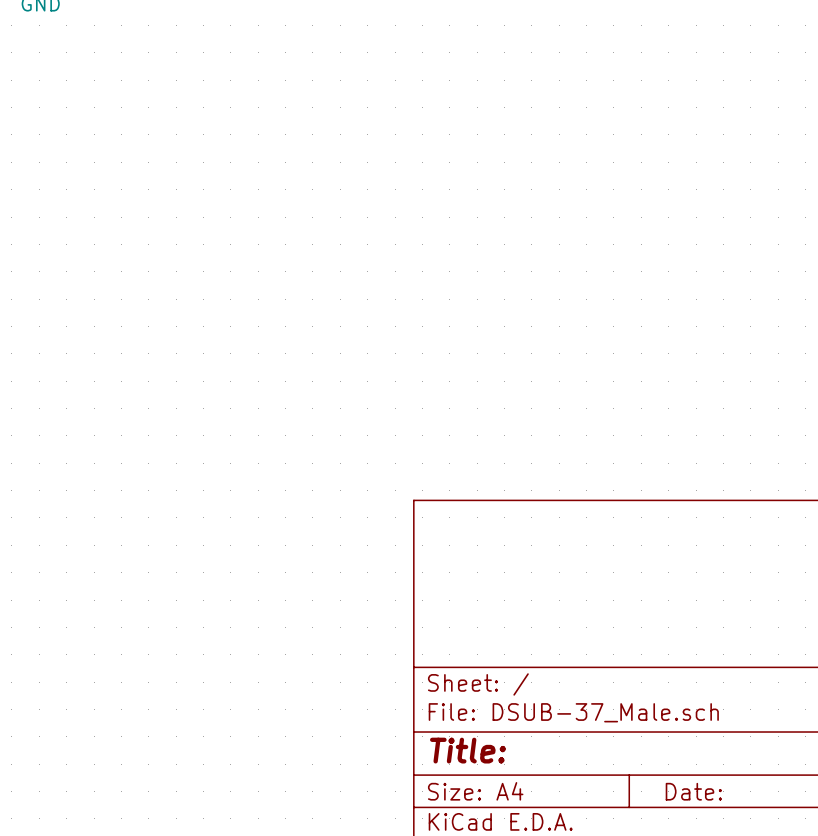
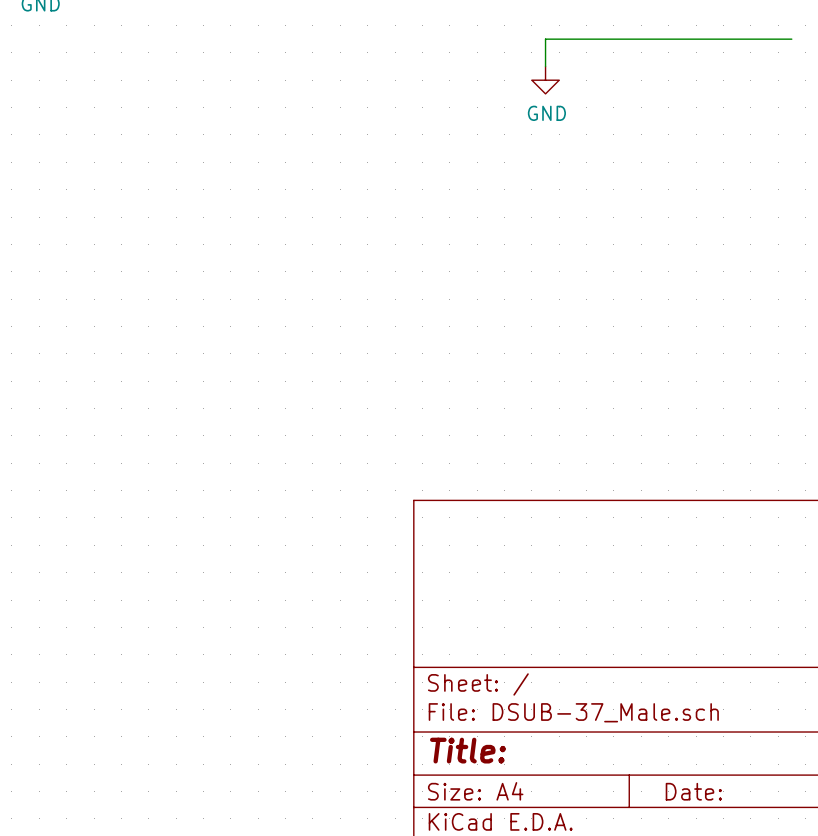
wire: none -> (791, 39) (545, 39) (545, 66)
power symbol: none -> GND (545, 80)

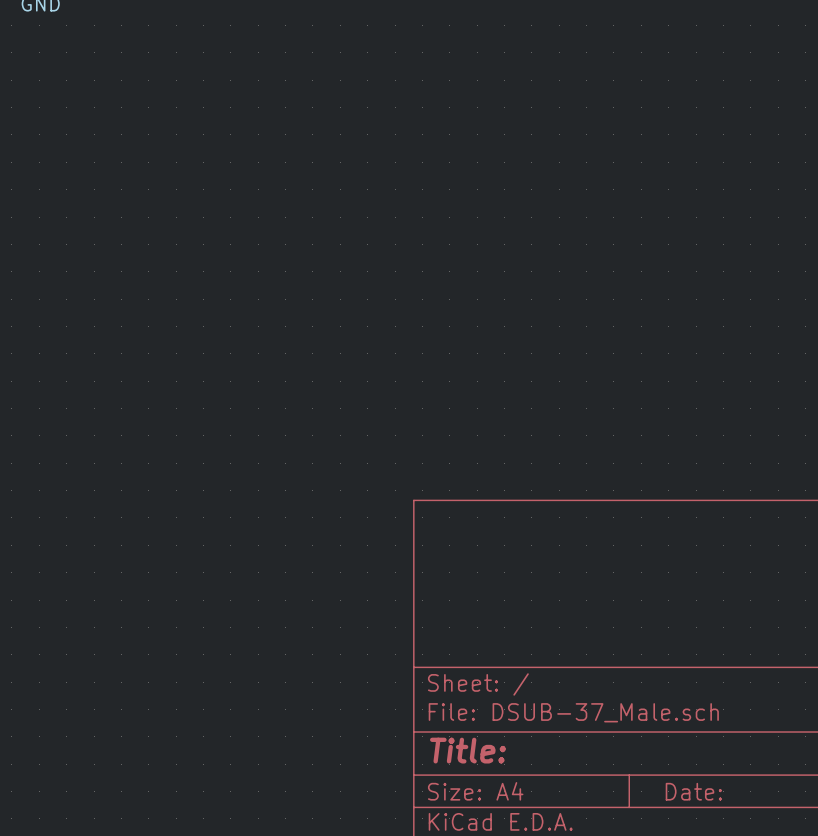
wire: (791, 39) (545, 39) (545, 66) -> none
power symbol: GND (545, 80) -> none

